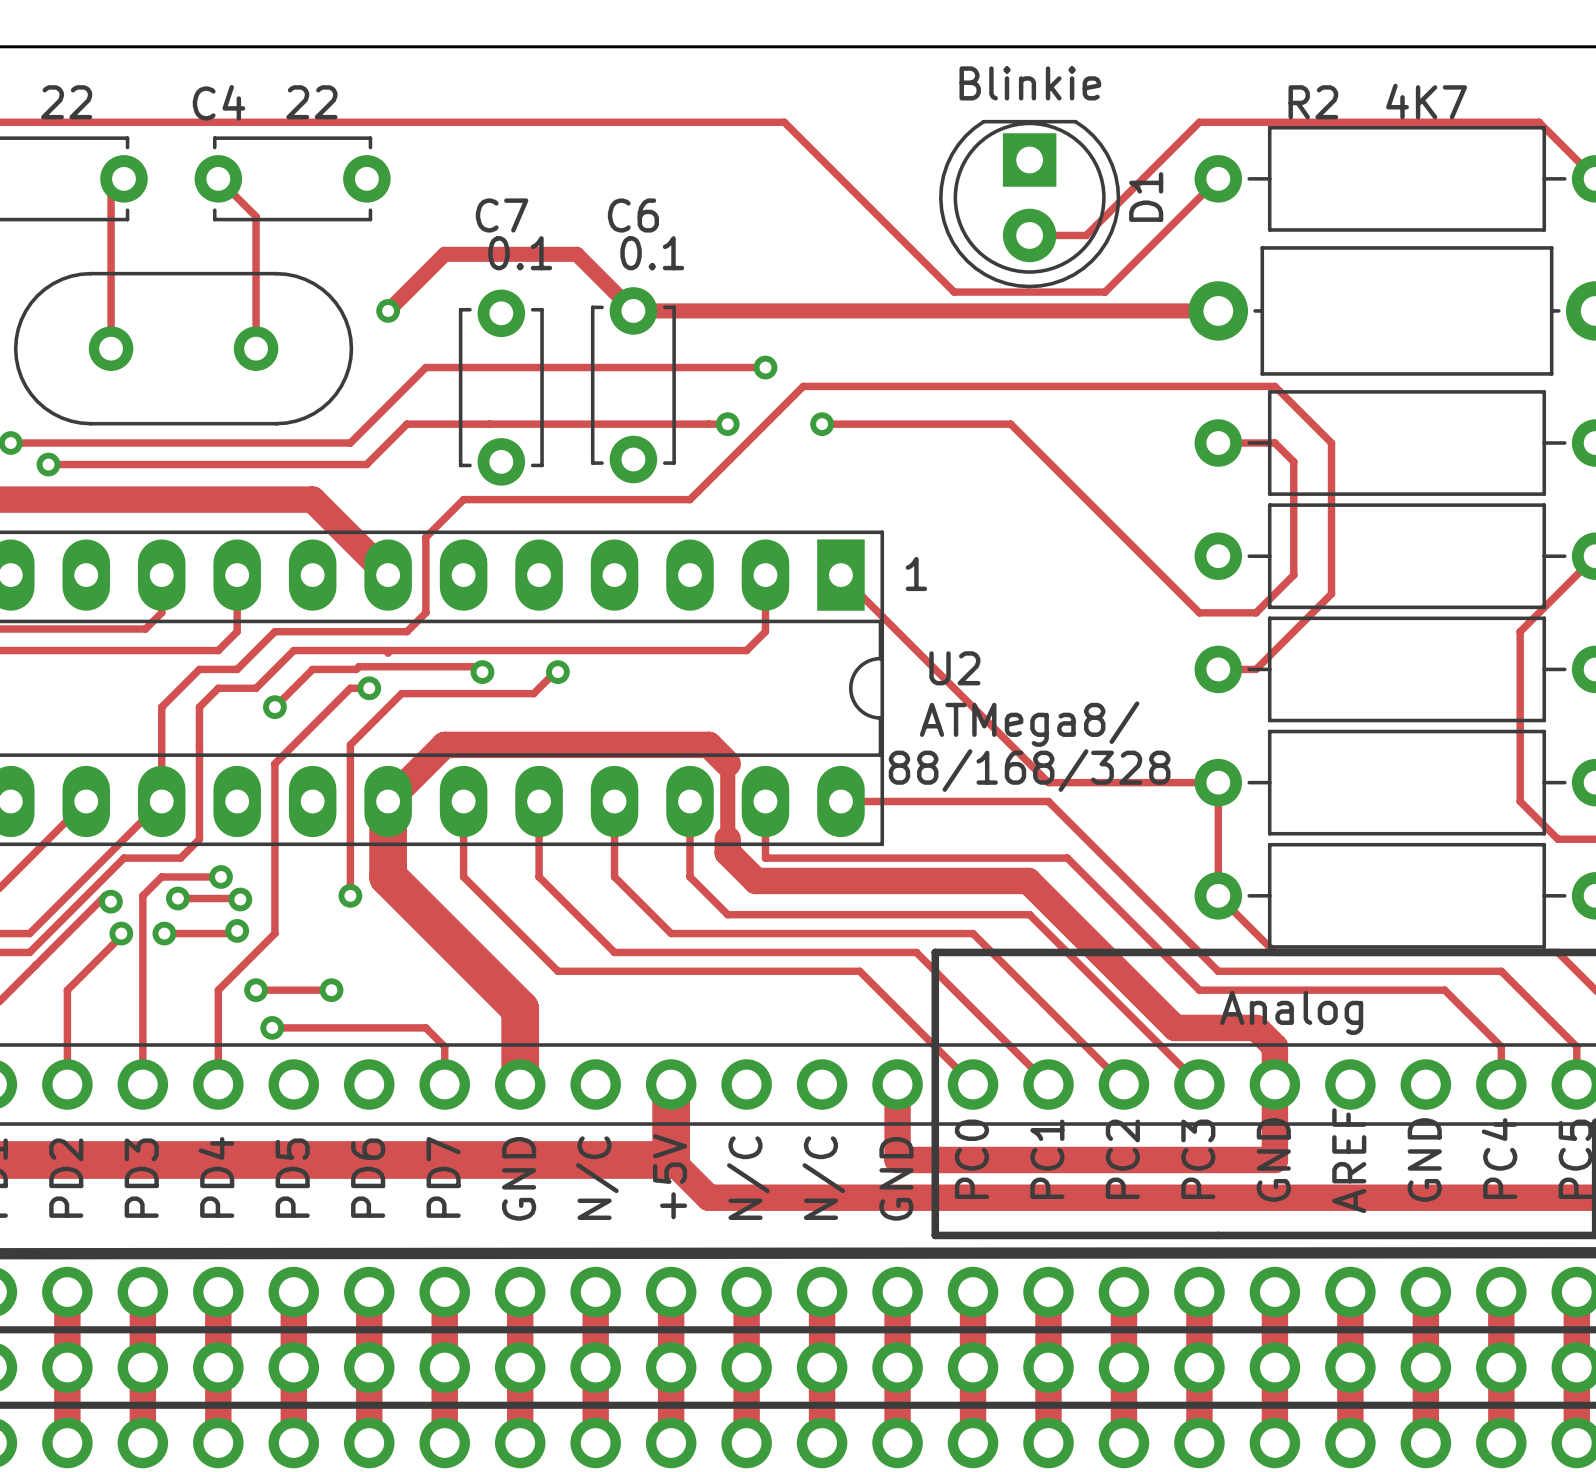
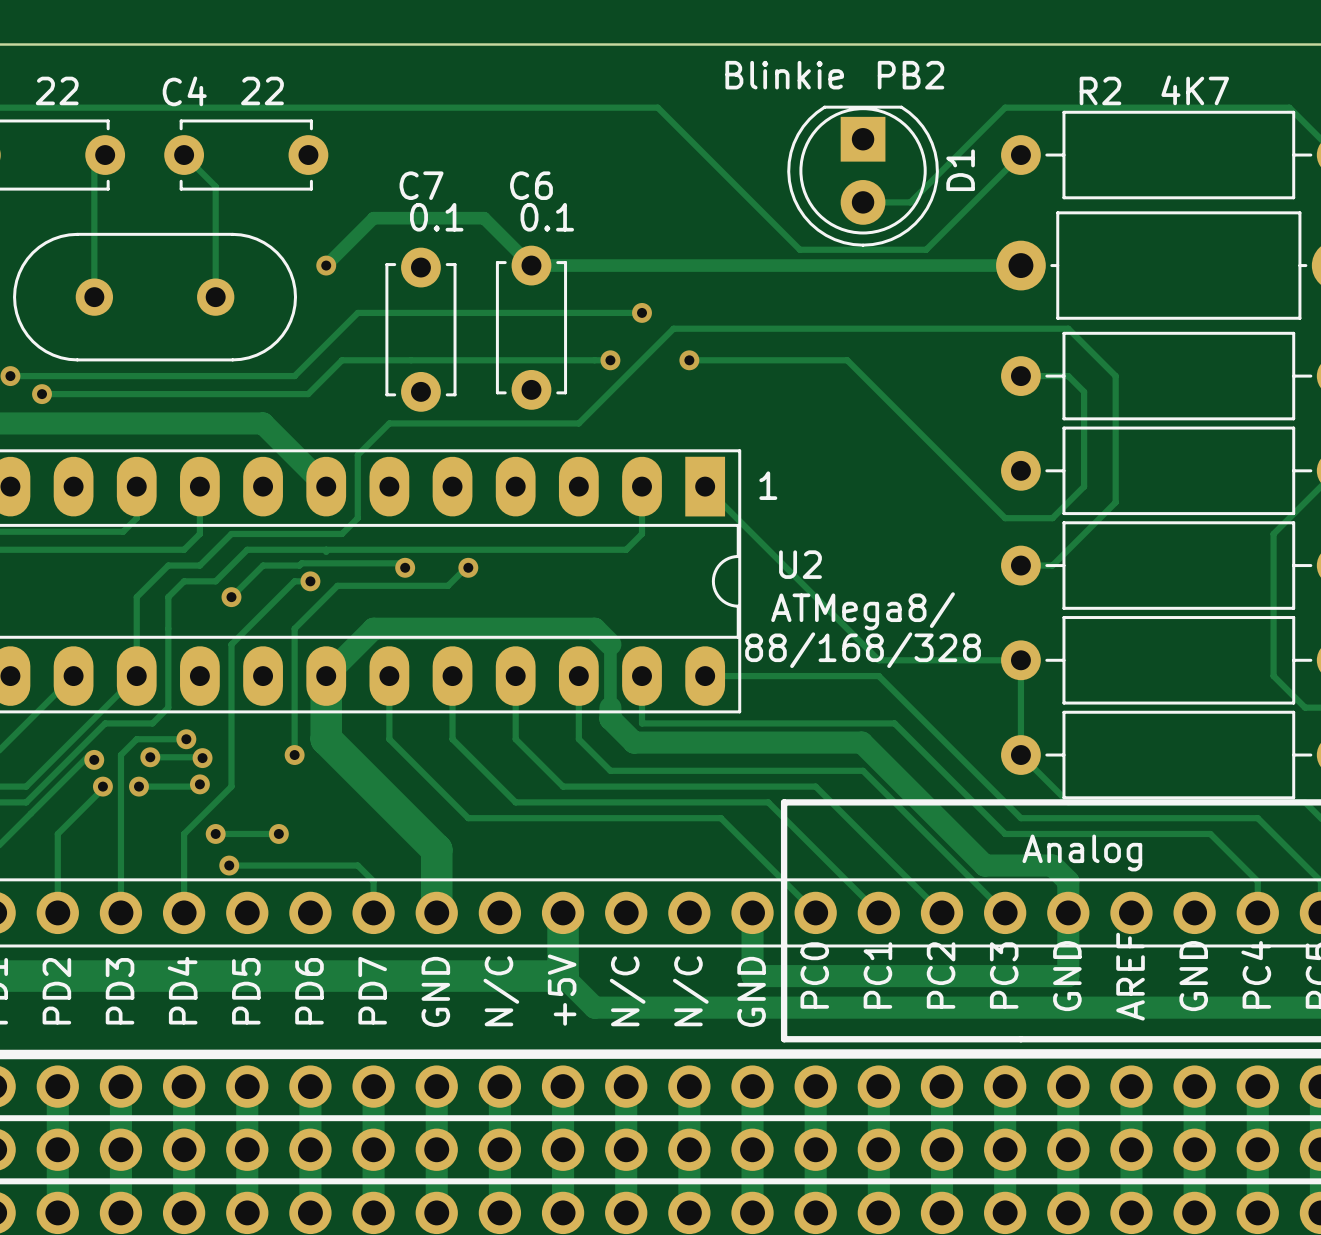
text position: Blinkie (1030, 83) -> Blinkie (784, 75)
text: none -> PB2 (911, 75)

